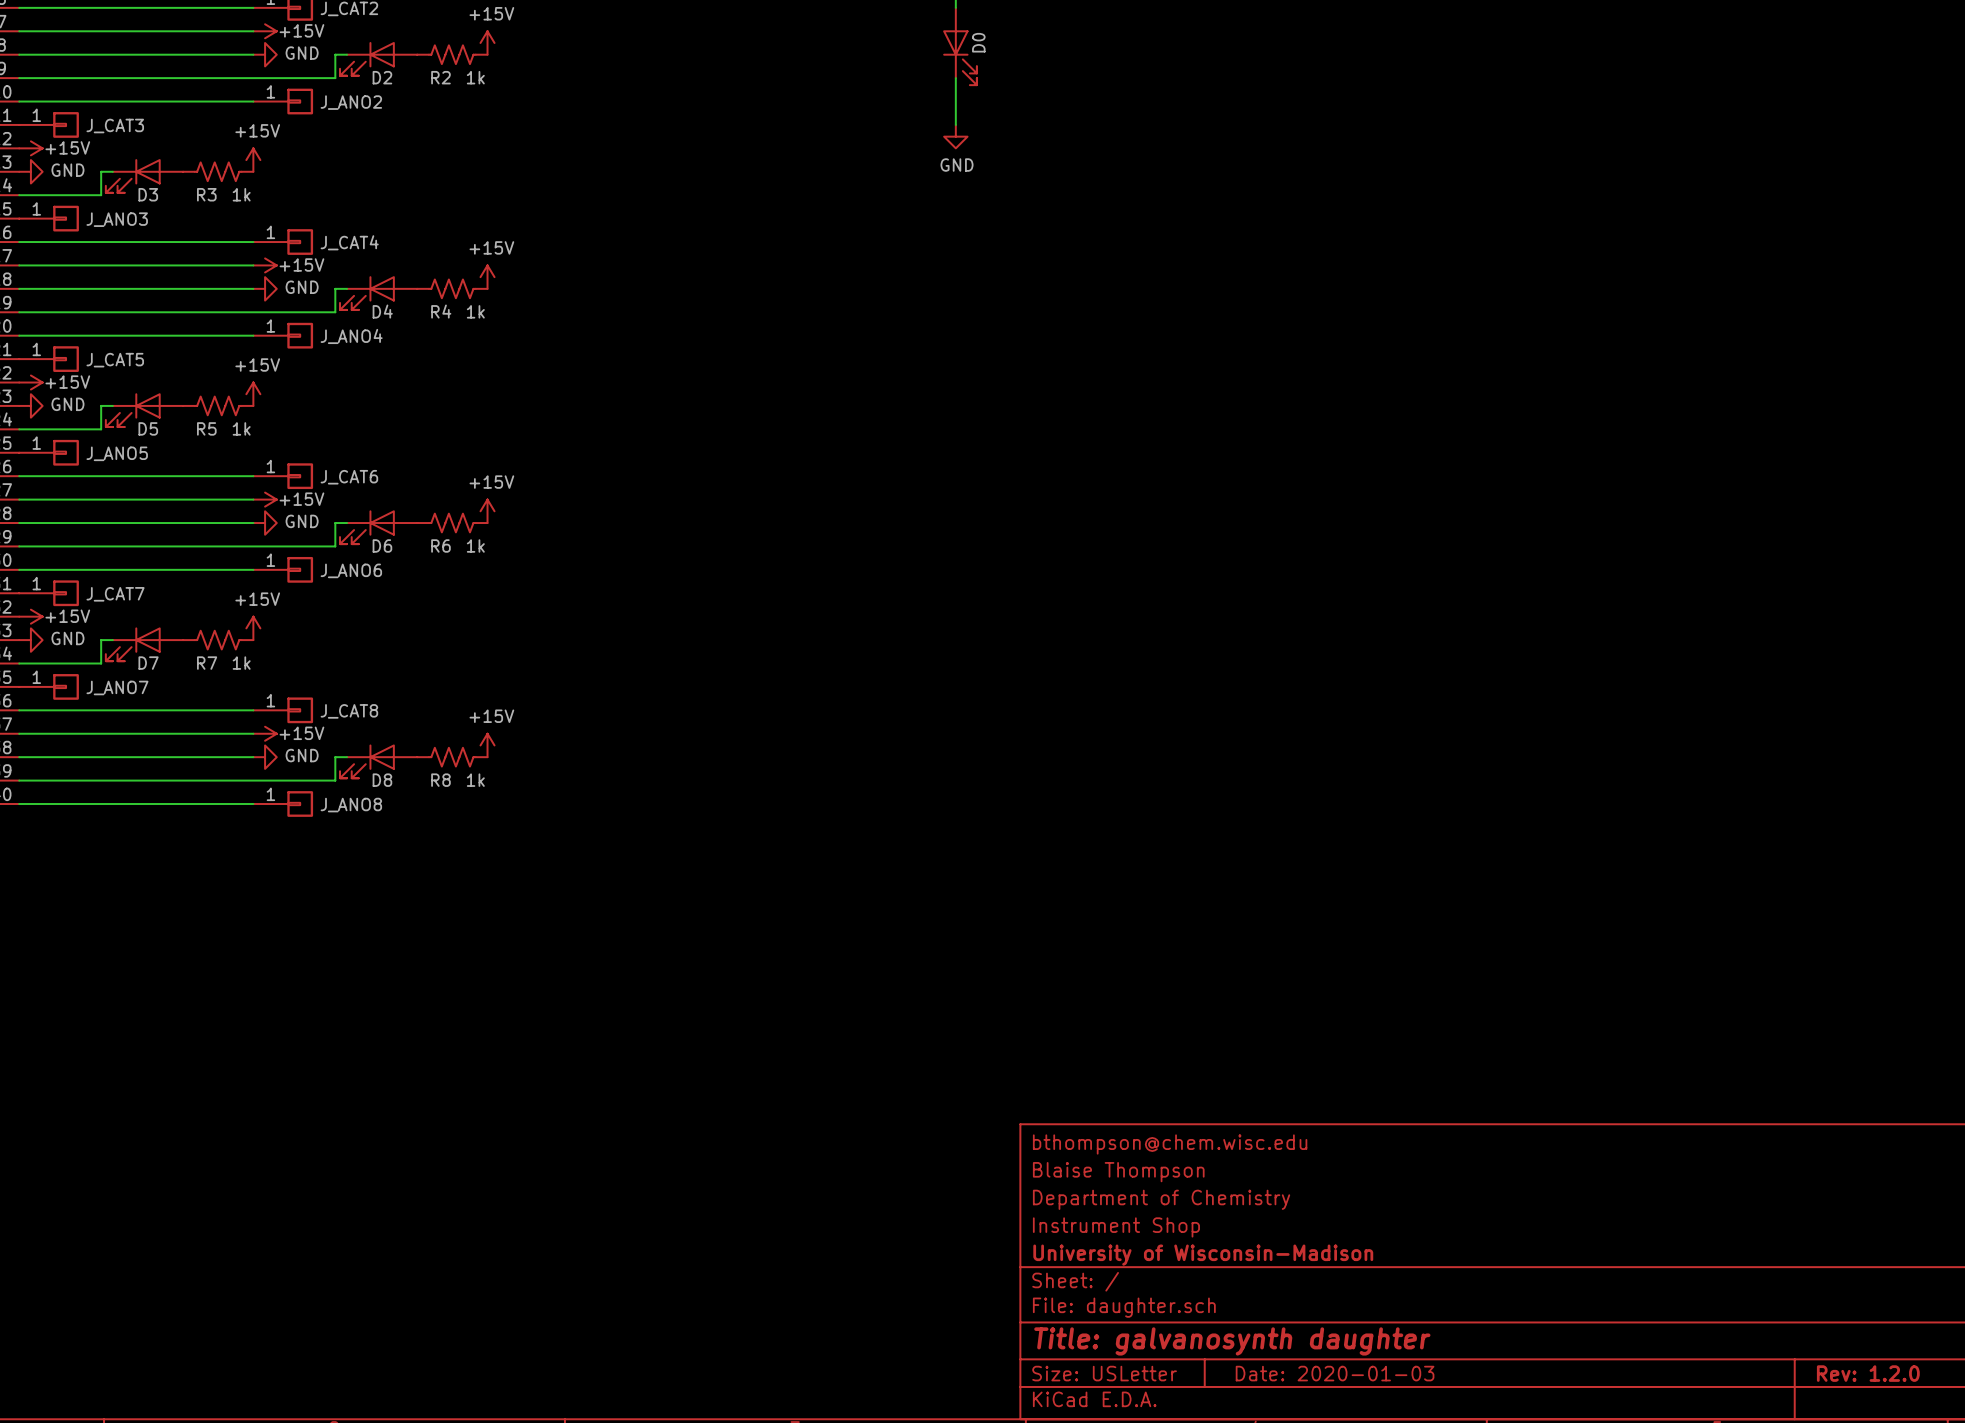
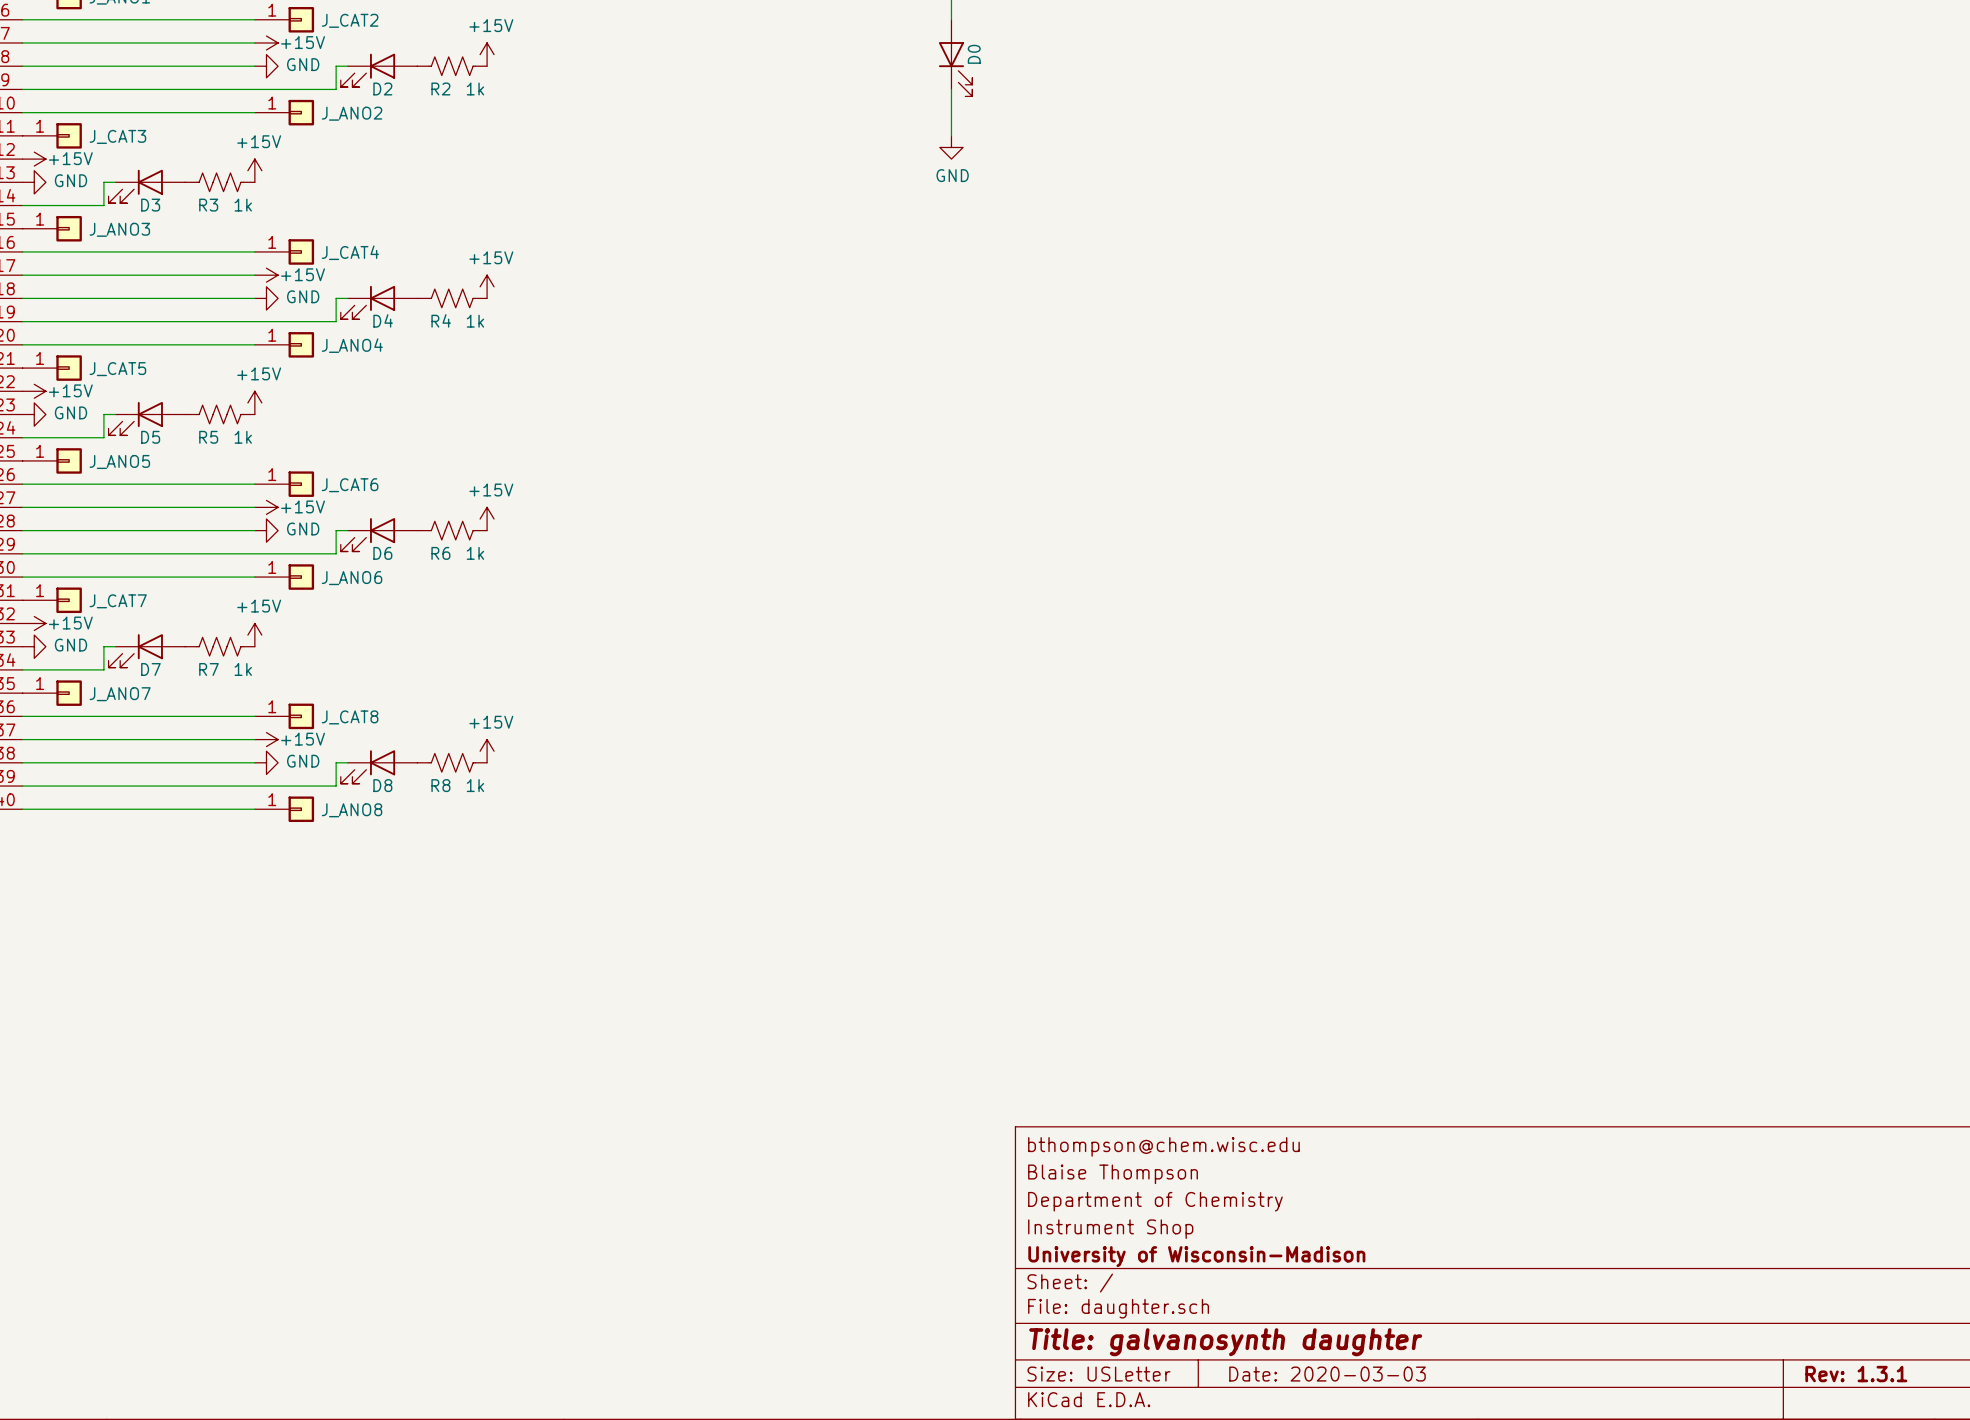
title block: Date: 2020-01-03 (1335, 1373) -> Date: 2020-03-03 (1327, 1374)
title block: Rev: 1.2.0 (1868, 1373) -> Rev: 1.3.1 (1856, 1374)

